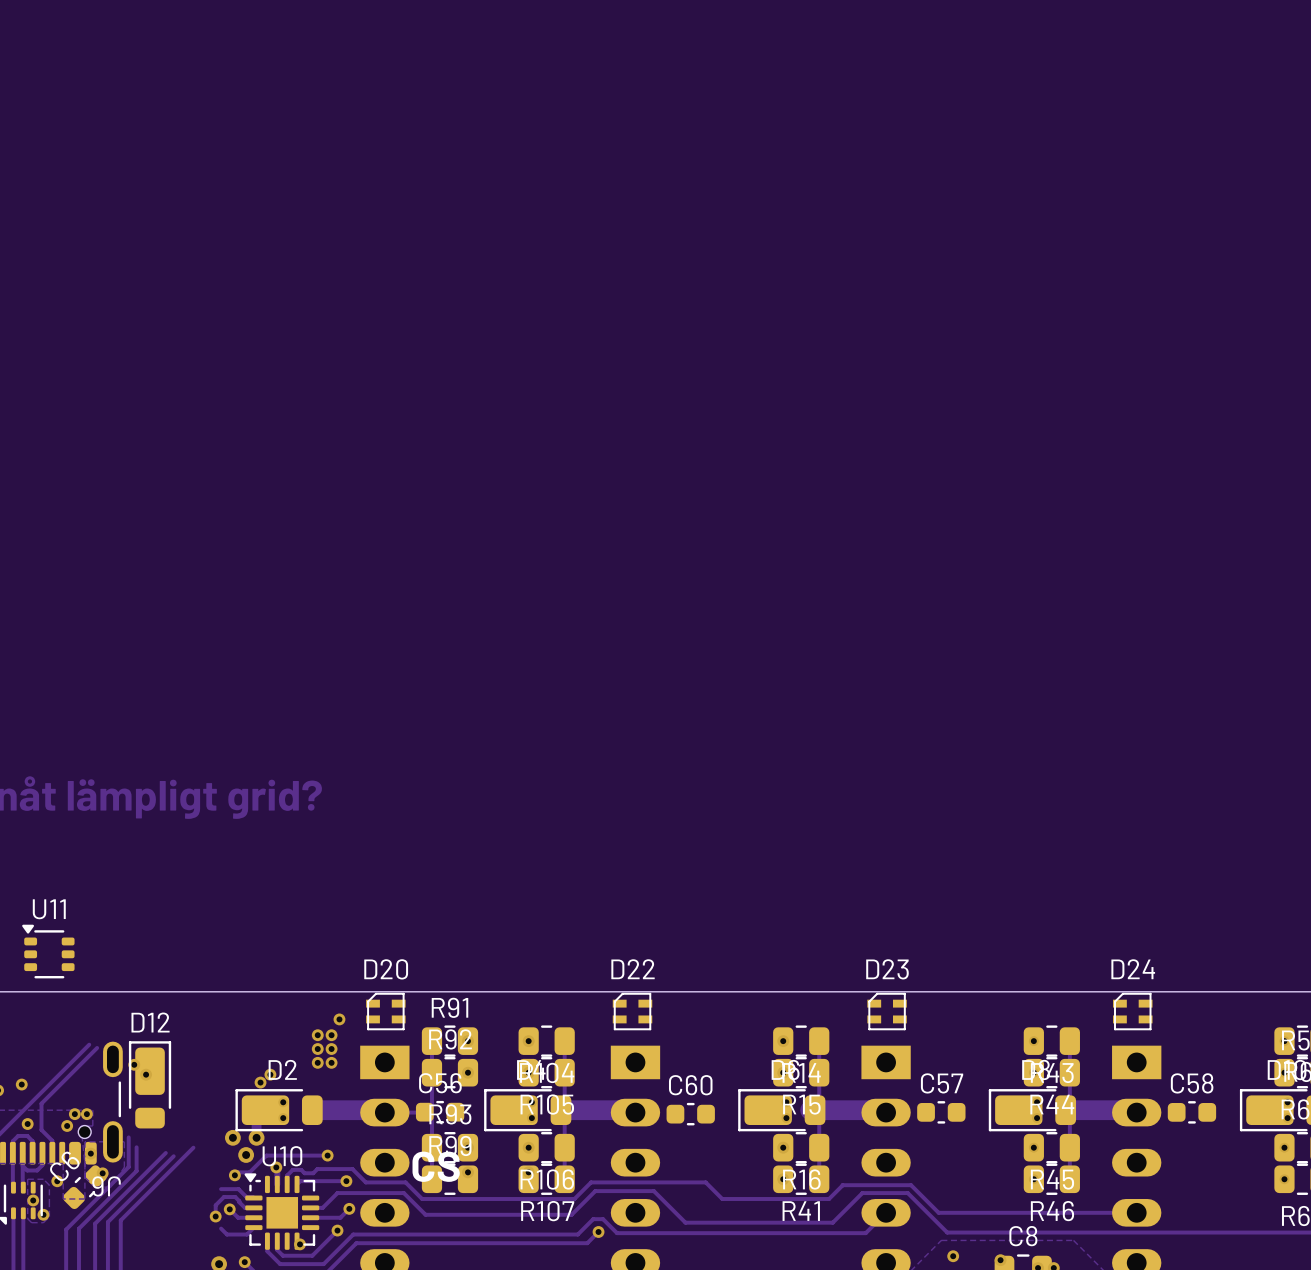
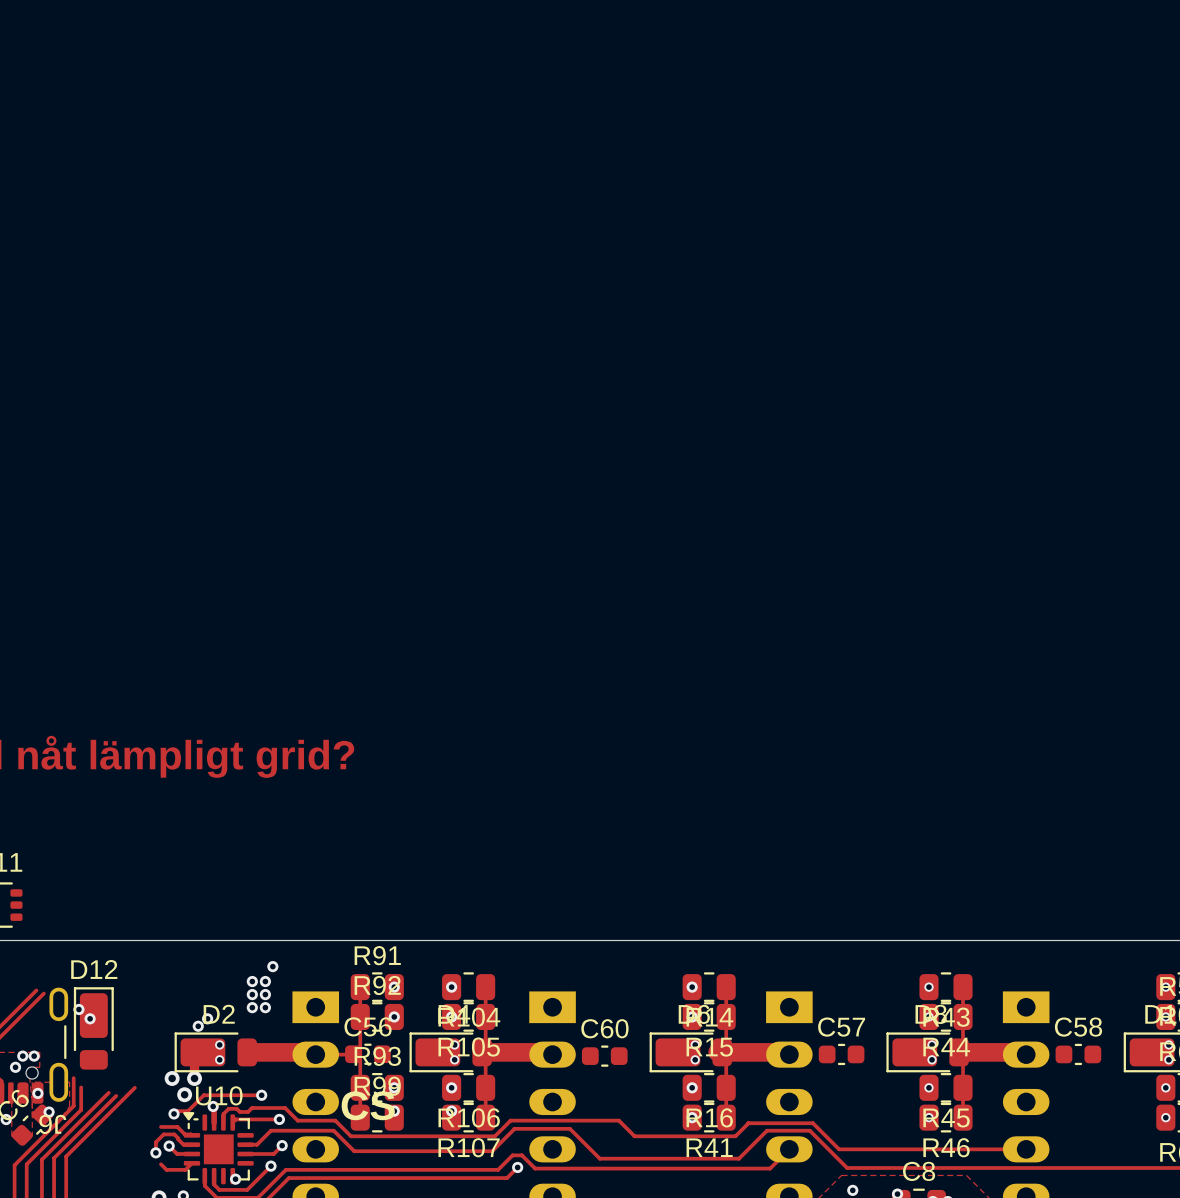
D20: (385, 1011) -> none
D22: (632, 1011) -> none
D23: (887, 1011) -> none
D24: (1132, 1011) -> none

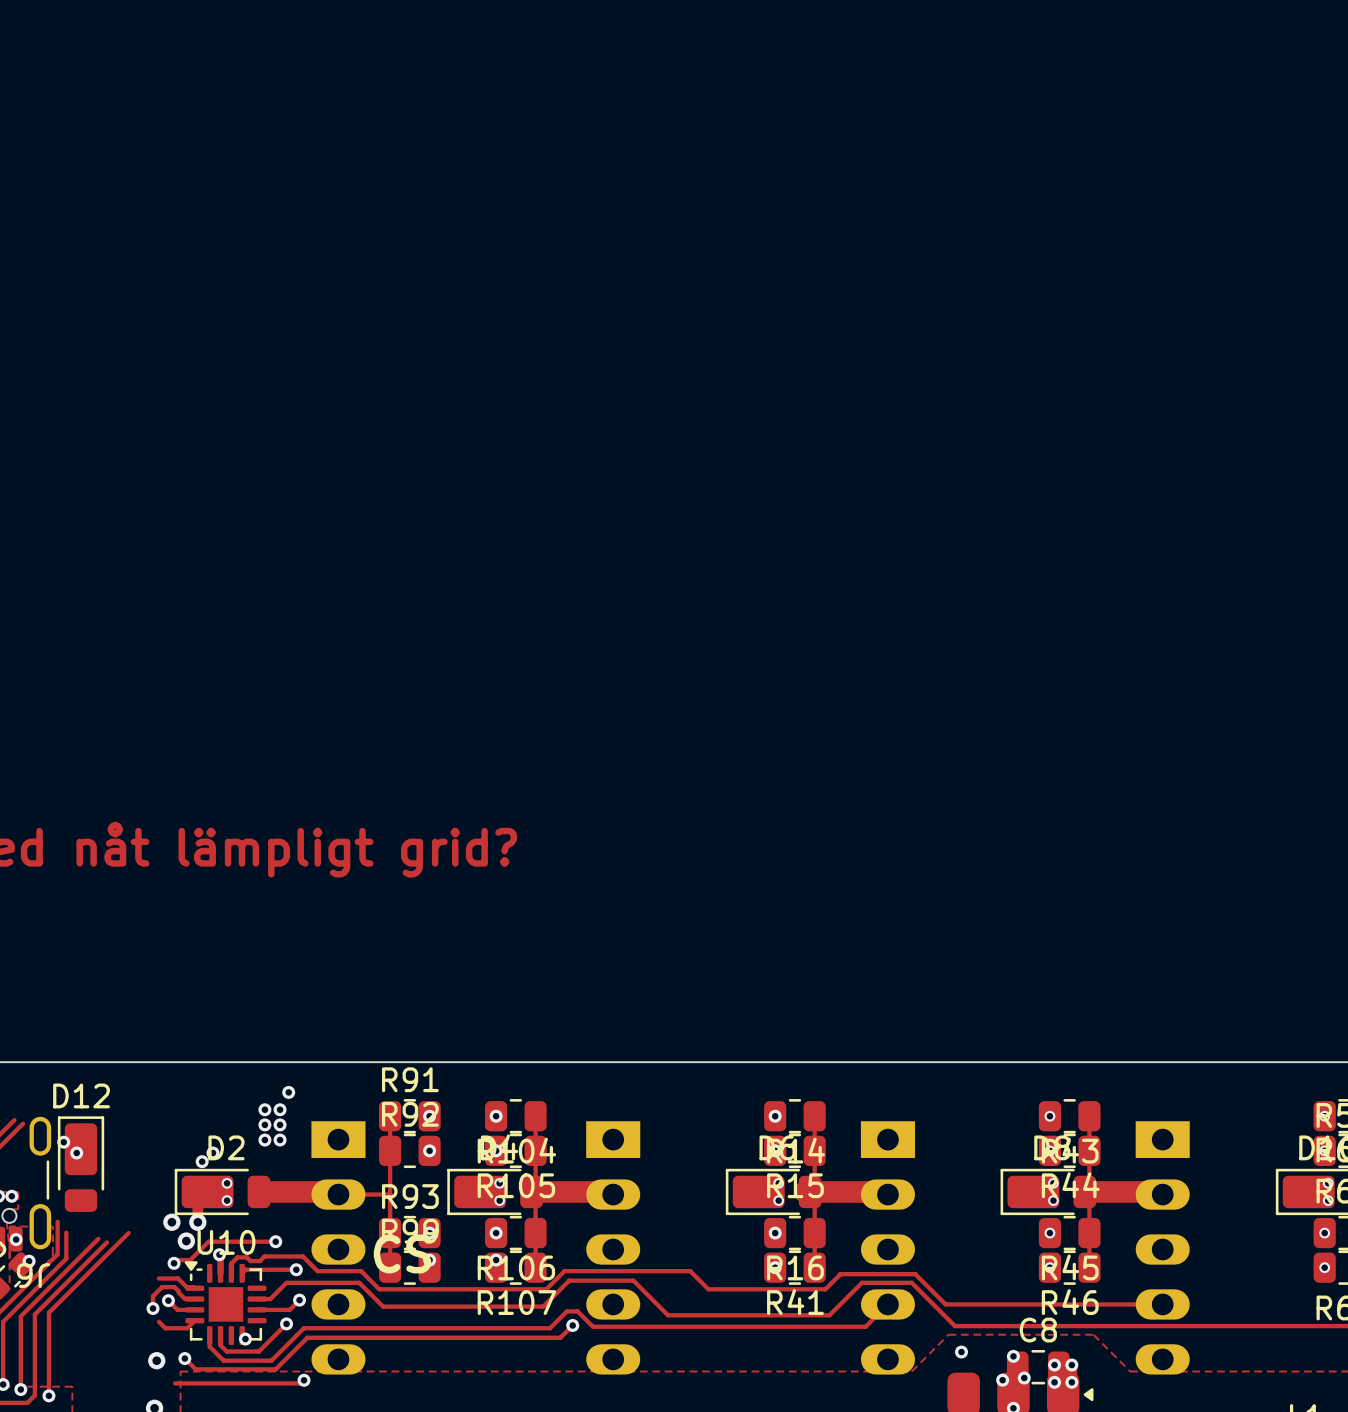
C56: (367, 1054) -> none
C57: (841, 1054) -> none
C58: (1078, 1054) -> none
C60: (604, 1056) -> none

